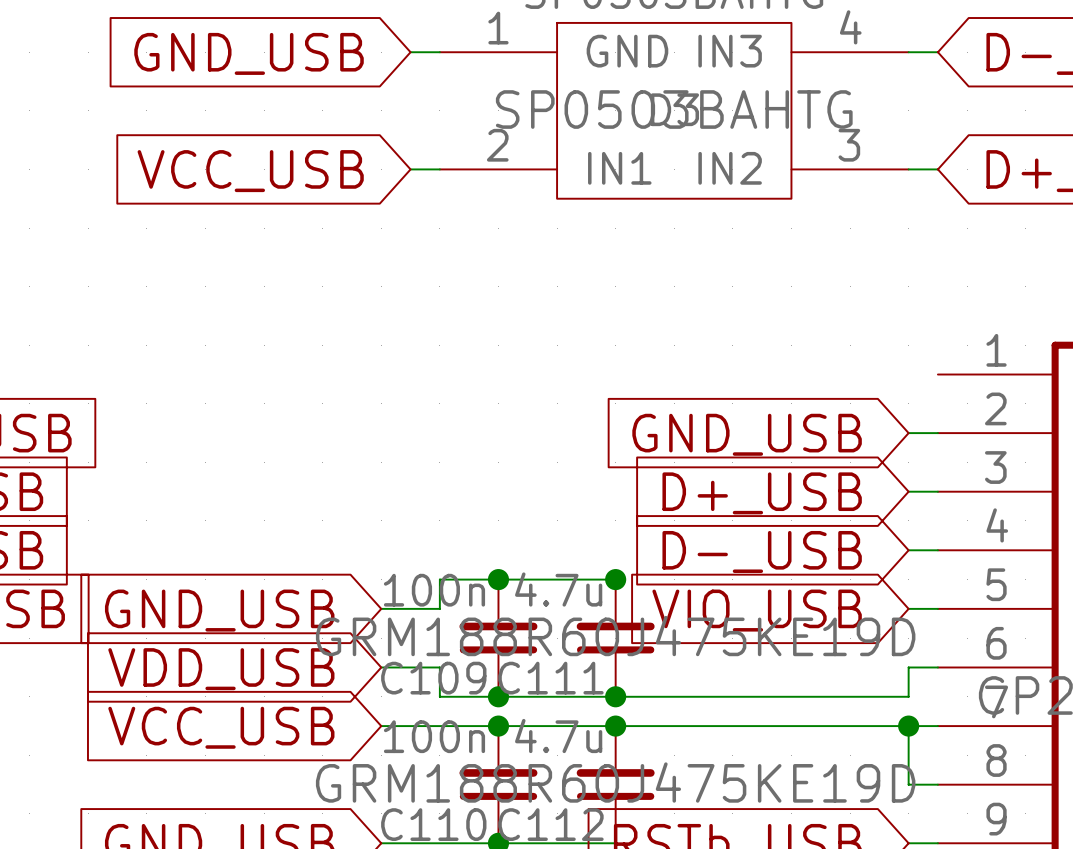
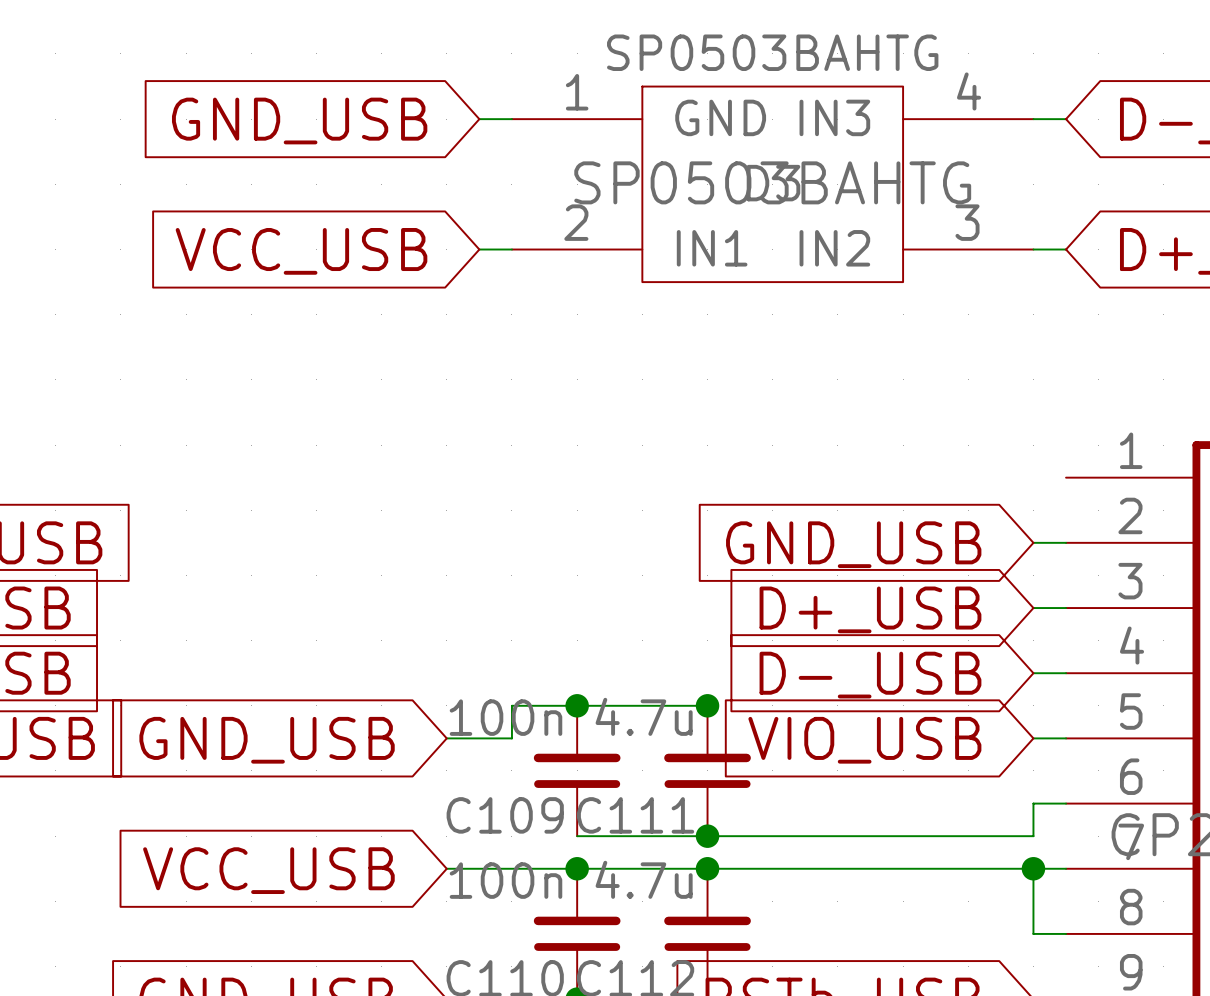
C111 text: GRM188R60J475KE19D (615, 636) -> none
wire: (381, 667) (439, 667) (439, 696) (498, 696) -> none
global label: VDD_USB (221, 669) -> none
junction: (498, 696) -> none
C112 text: GRM188R60J475KE19D (615, 782) -> none

